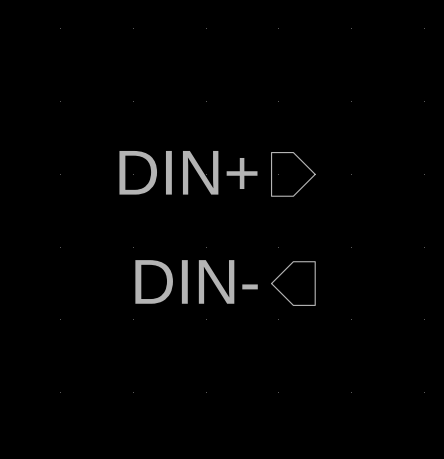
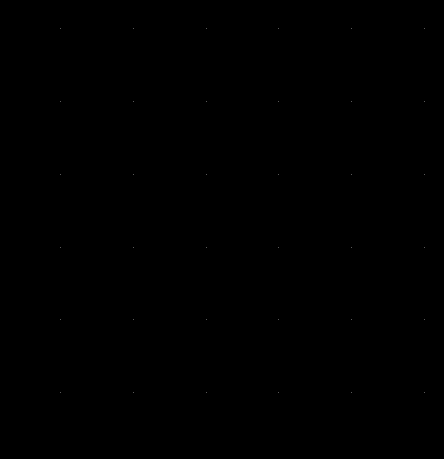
hierarchical label: DIN+ (188, 172) -> none
hierarchical label: DIN- (196, 281) -> none

